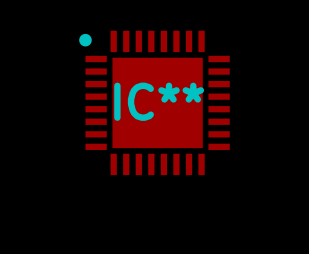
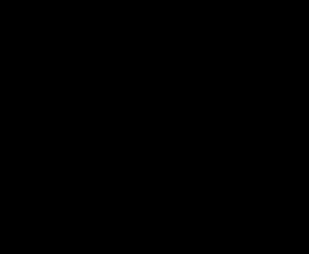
IC**: (154, 102) -> none

